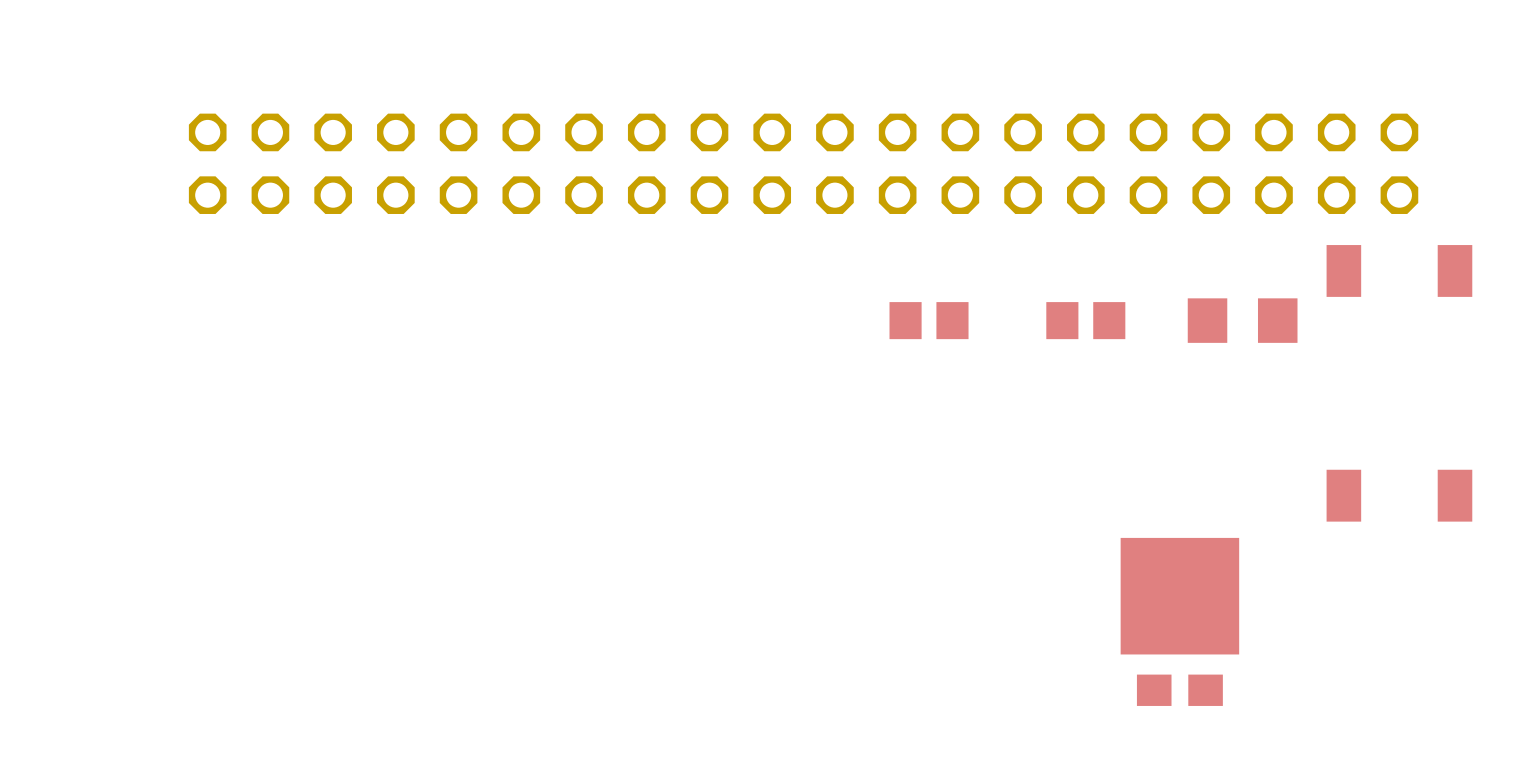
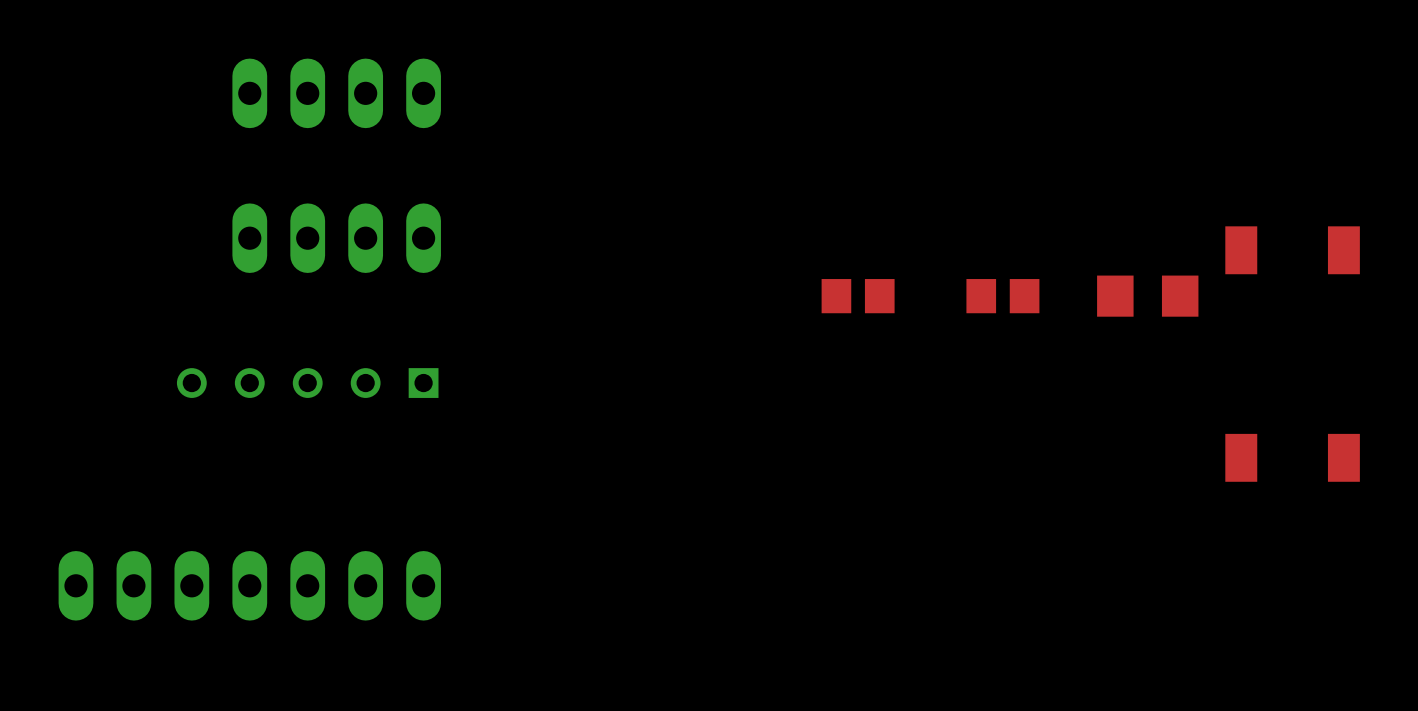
part: none -> (336, 93)
part: (803, 163) -> none
part: none -> (336, 238)
part: none -> (307, 383)
part: (1179, 621) -> none
part: none -> (249, 585)

